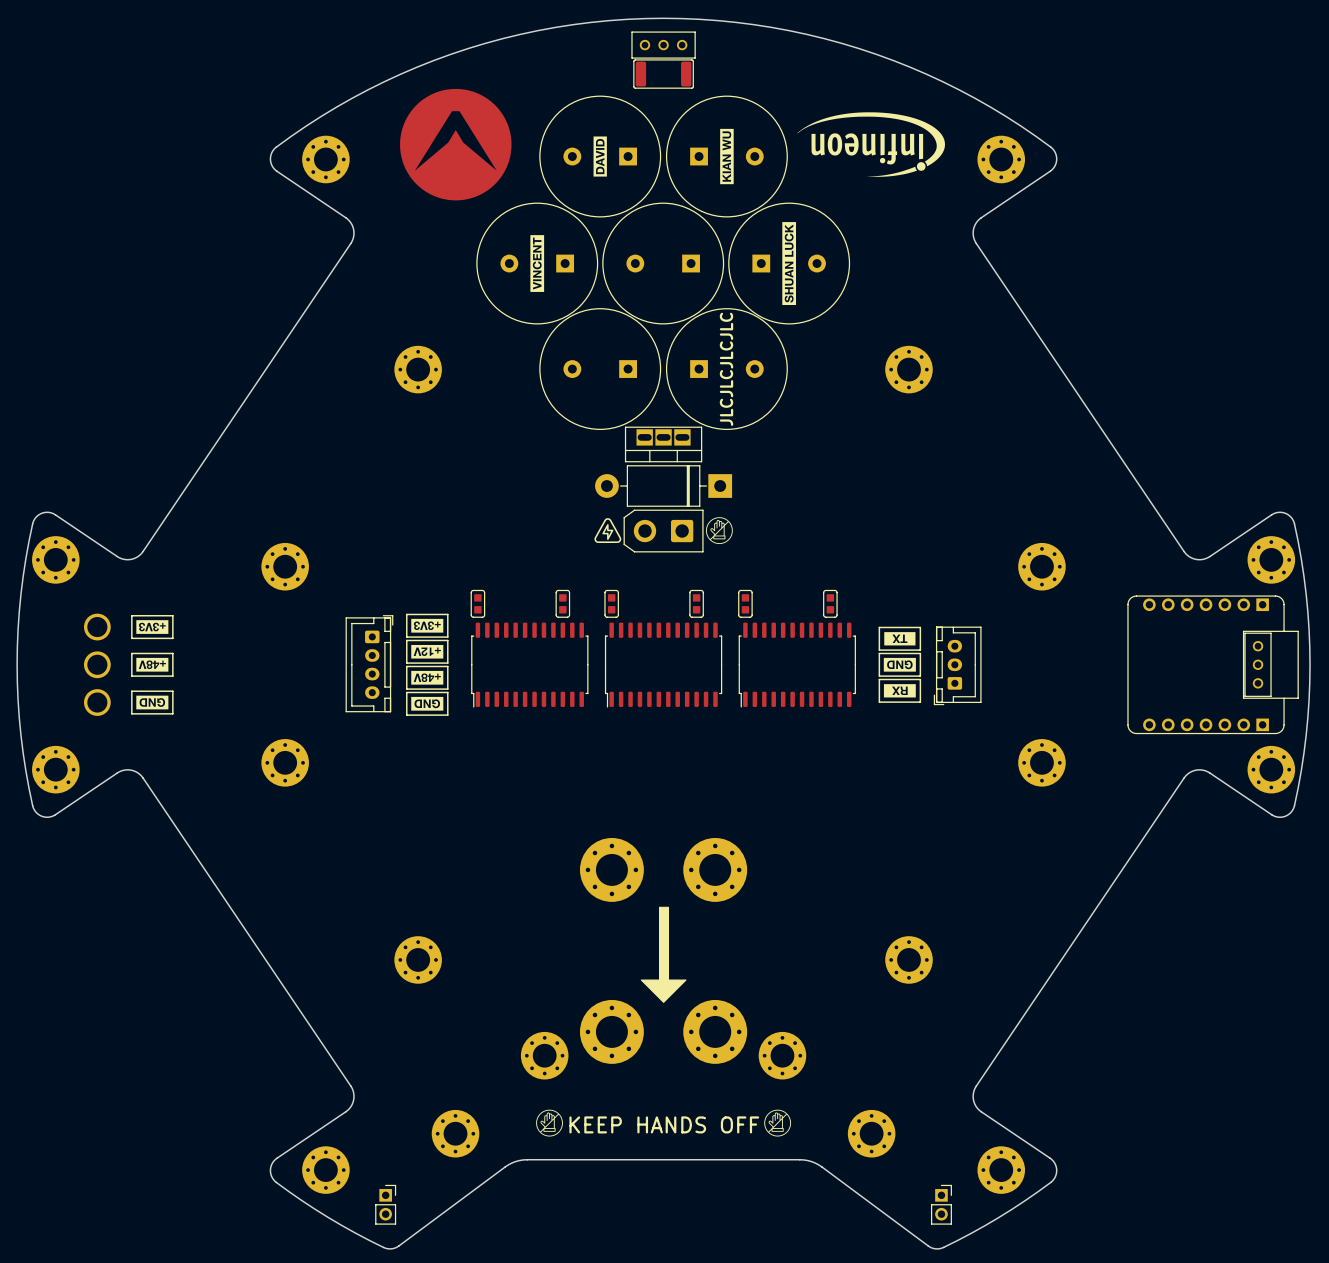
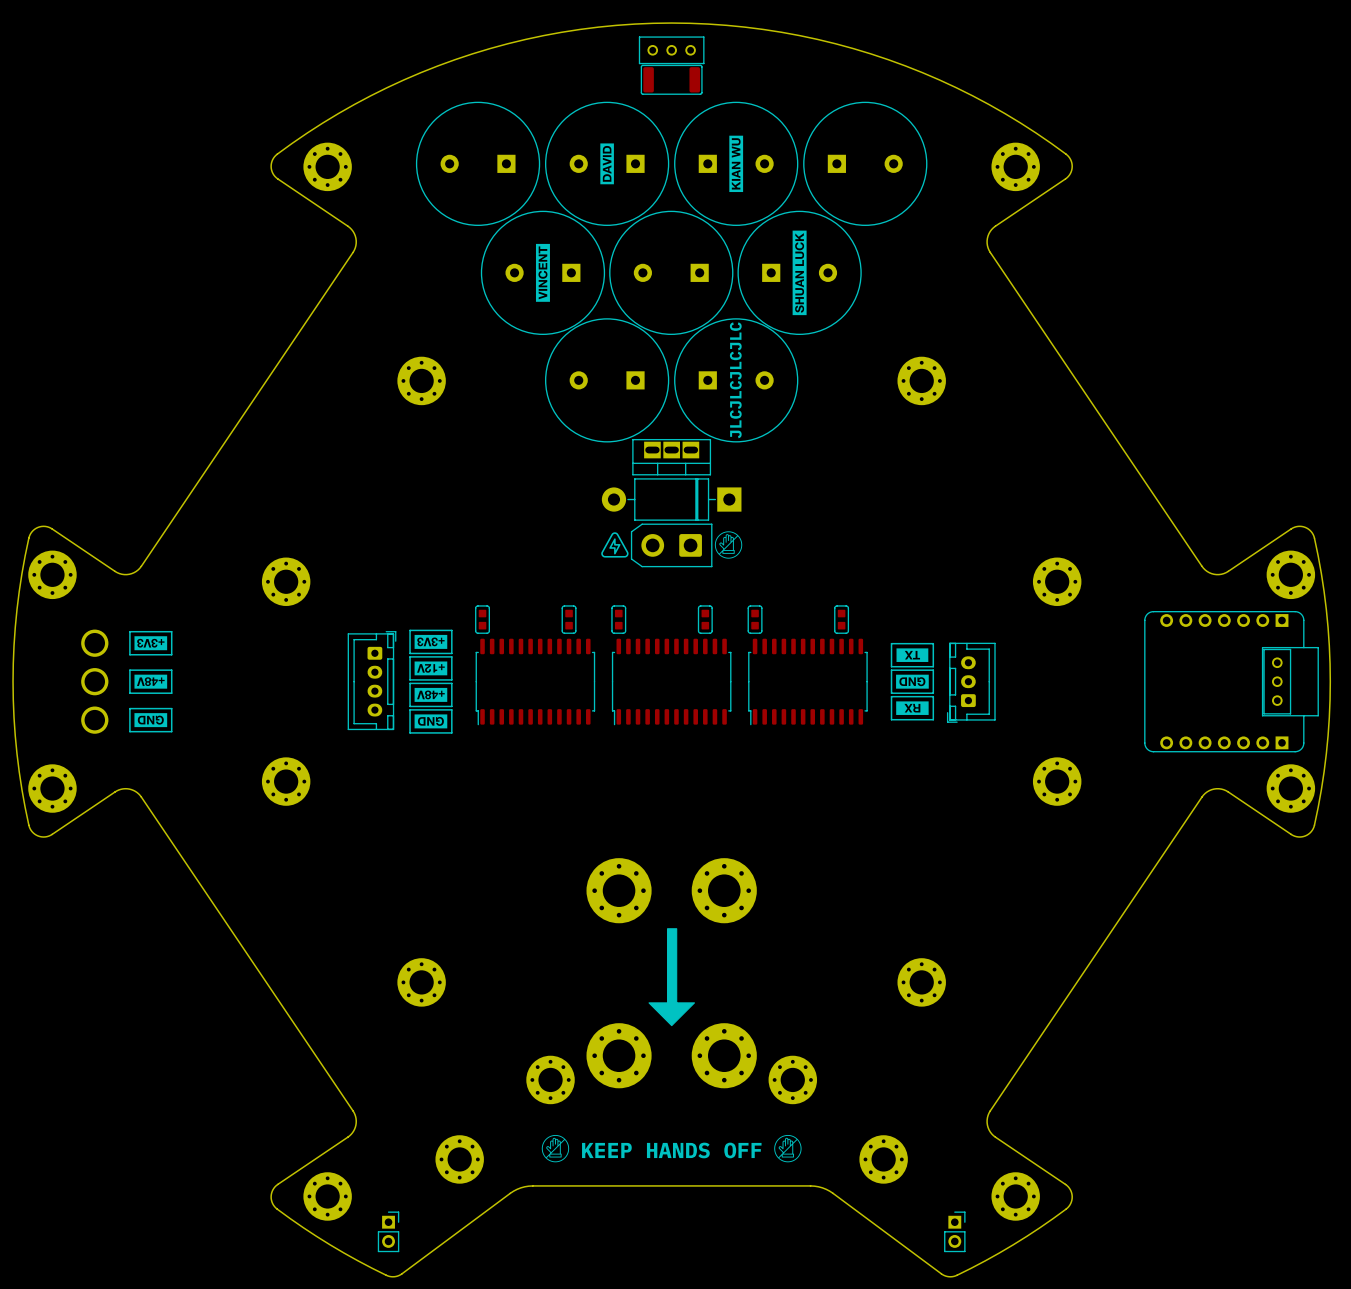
drawing: [797, 112, 945, 177] -> none
part: (455, 144) -> none
part: none -> (478, 163)
part: none -> (865, 163)

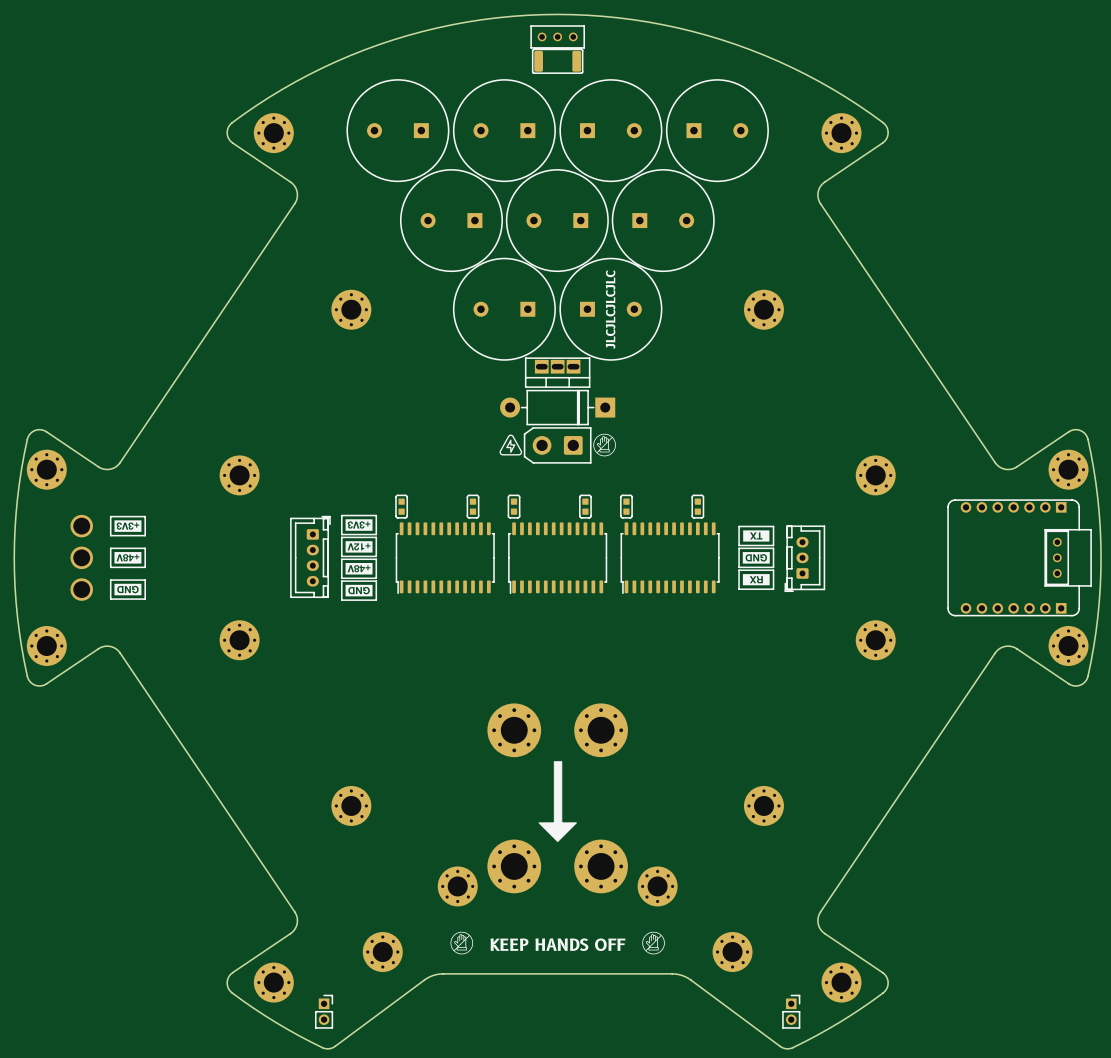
drawing: [729, 135, 744, 193] -> none
drawing: [600, 143, 614, 185] -> none
drawing: [792, 230, 807, 316] -> none
drawing: [535, 243, 550, 302] -> none

